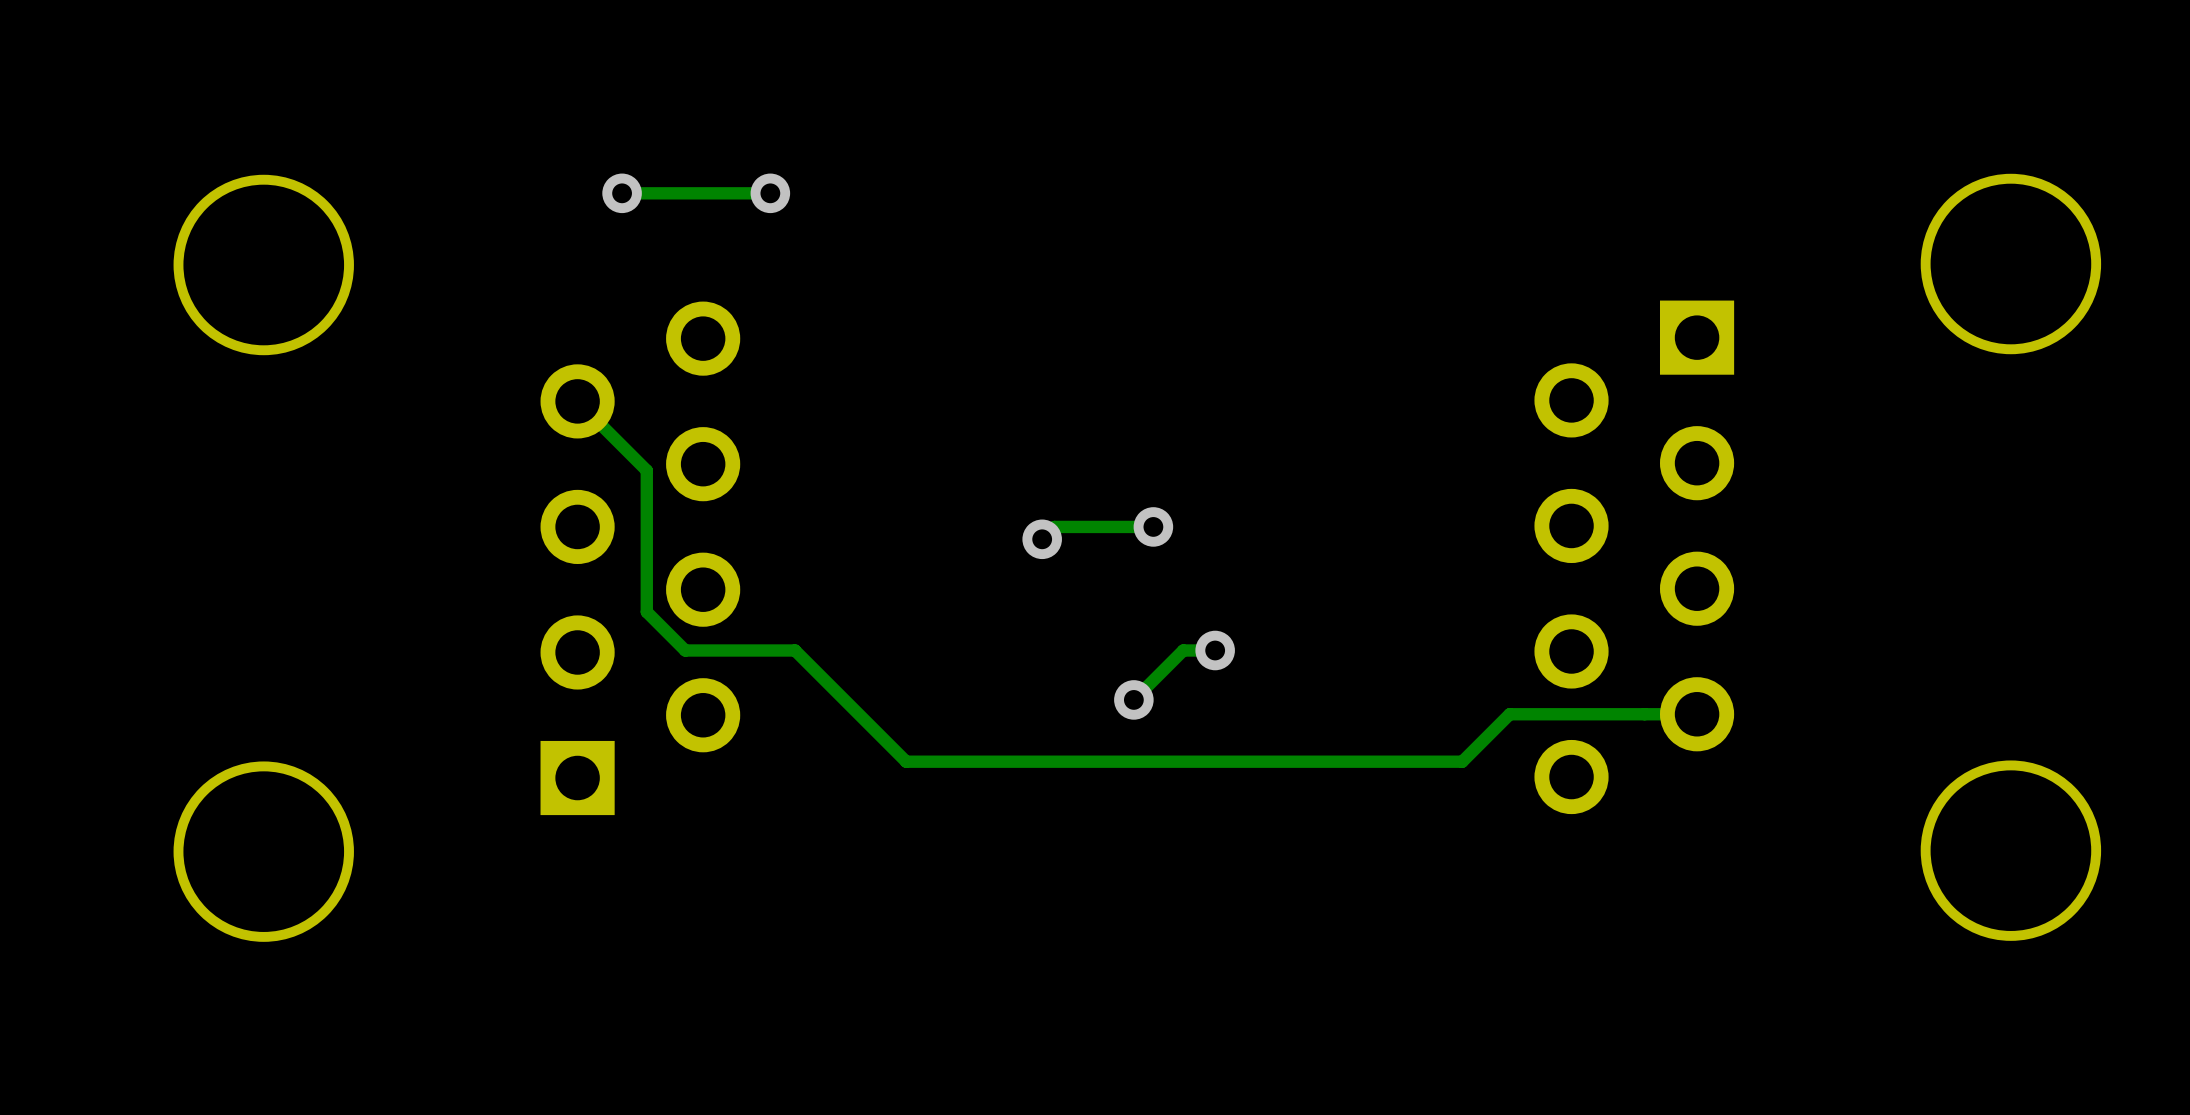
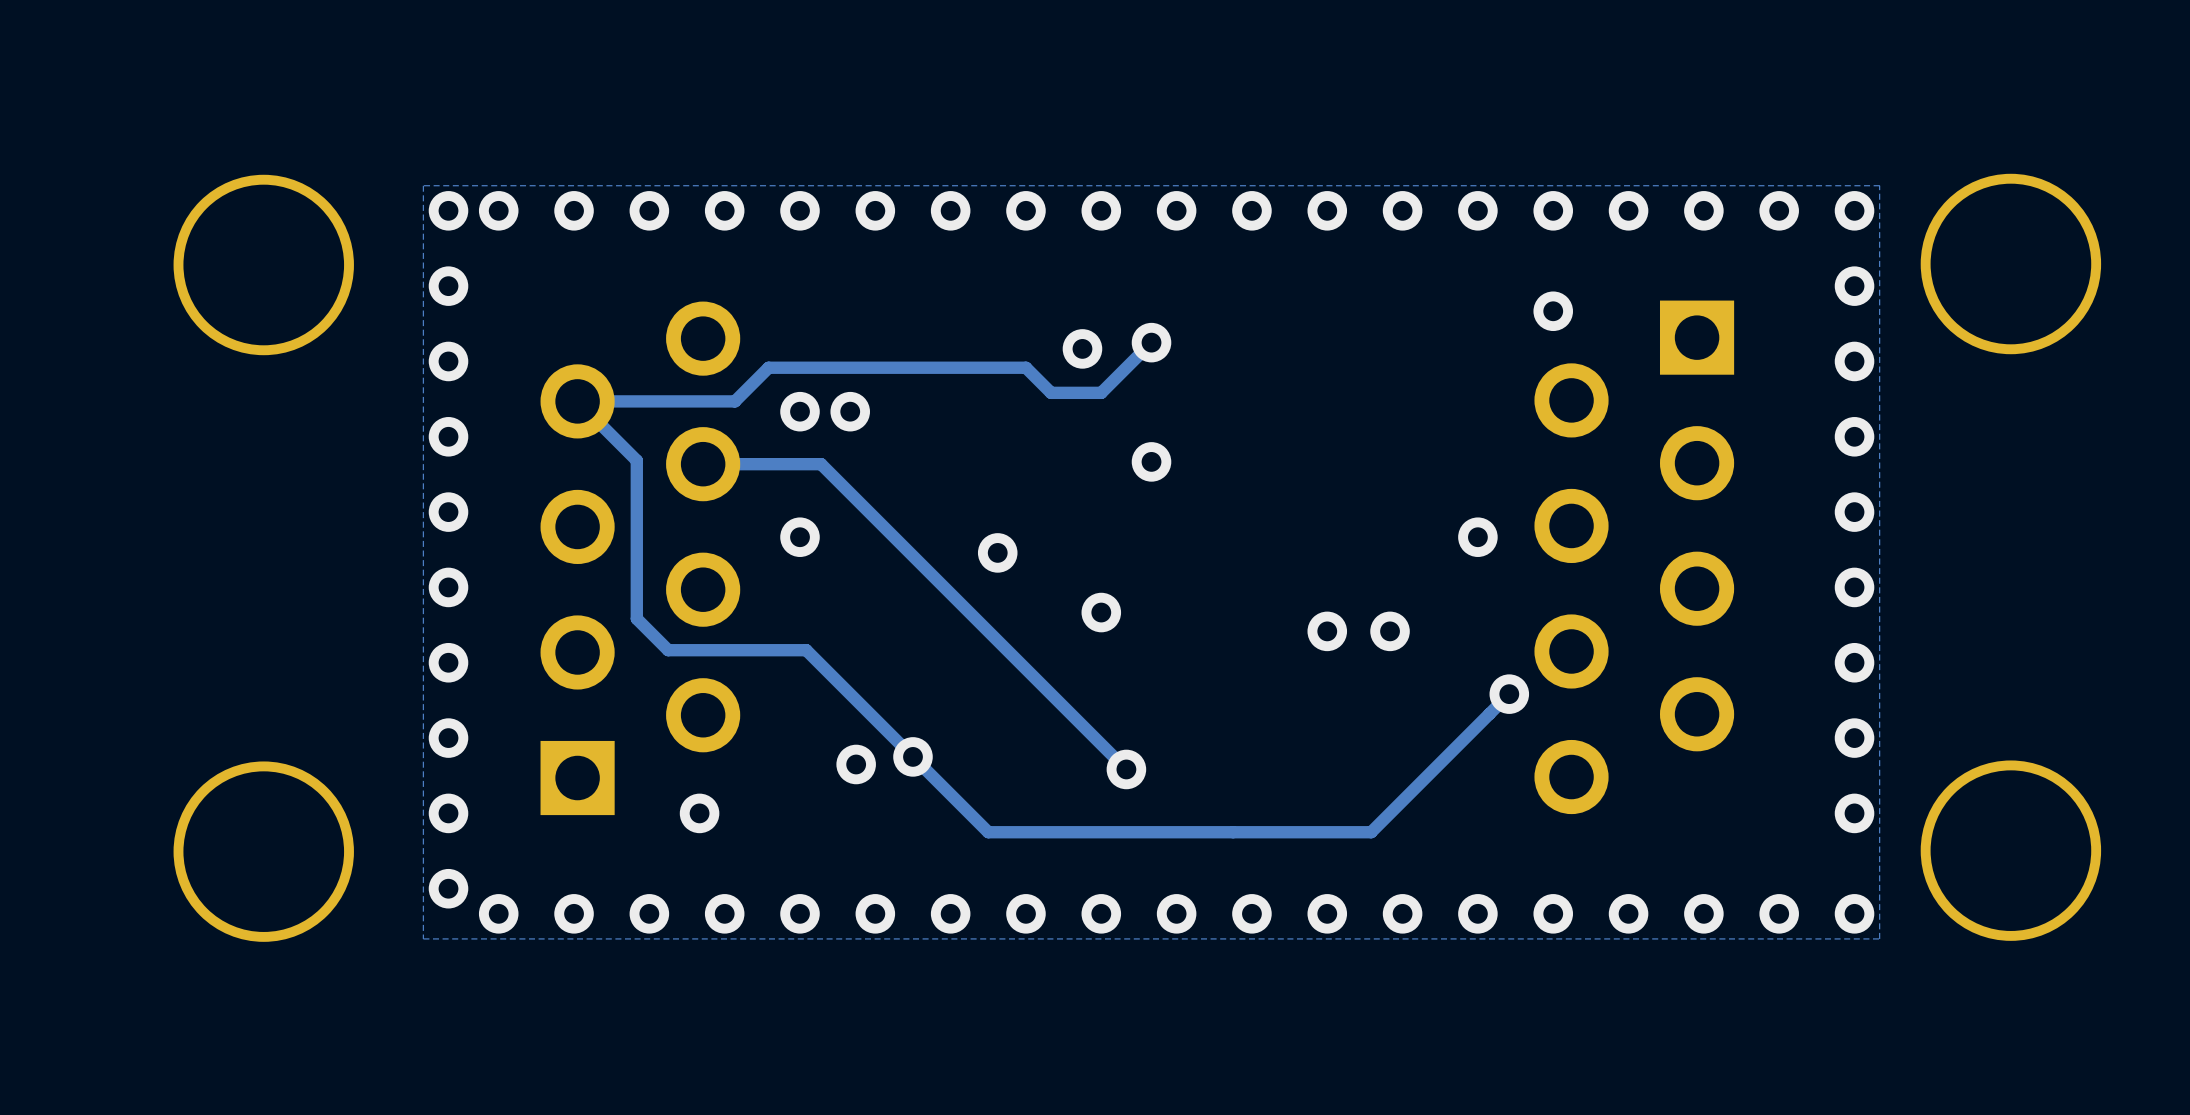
zone outline: none -> (1879, 185) (423, 185) (423, 938) (1879, 938) (1879, 185)
via position: (622, 193) -> (649, 210)
track: (770, 193) (622, 193) -> none
via position: (770, 193) -> (800, 210)
via: none -> (448, 210)
via: none -> (498, 210)
via: none -> (574, 210)
via: none -> (724, 210)
via: none -> (875, 210)
via: none -> (950, 210)
via: none -> (1025, 210)
via: none -> (1101, 210)
via: none -> (1176, 210)
via: none -> (1251, 210)
via: none -> (1327, 210)
via: none -> (1402, 210)
via: none -> (1477, 210)
via: none -> (1553, 210)
via: none -> (1628, 210)
via: none -> (1703, 210)
via: none -> (1779, 210)
via: none -> (1854, 210)
via: none -> (448, 286)
via: none -> (1854, 286)
via: none -> (1553, 311)
track: none -> (1151, 342) (1101, 392) (1051, 392) (1025, 367) (768, 367) (734, 401) (577, 401)
via: none -> (1151, 342)
via: none -> (1082, 348)
via: none -> (448, 361)
via: none -> (1854, 361)
via: none -> (800, 411)
via: none -> (850, 411)
via: none -> (448, 436)
via: none -> (1854, 436)
track: (636, 460) (646, 470) (646, 612) (685, 650) (795, 650) (906, 761) (1462, 761) (1509, 714) (1697, 714) -> (636, 460) (636, 618) (668, 650) (806, 650) (988, 832) (1371, 832) (1509, 694)
via: none -> (1151, 461)
track: none -> (703, 464) (821, 464) (1126, 769)
via: none -> (448, 512)
via: none -> (1854, 512)
track: (1153, 526) (1054, 526) (1042, 539) -> none
via: (1153, 526) -> none
via: none -> (800, 537)
via: none -> (1477, 537)
via position: (1042, 539) -> (997, 552)
via: none -> (448, 587)
via: none -> (1854, 587)
via: none -> (1101, 612)
via: none -> (1327, 631)
via: none -> (1390, 631)
track: (1215, 650) (1183, 650) (1133, 699) -> none
via: (1215, 650) -> none
via: none -> (448, 662)
via: none -> (1854, 662)
via: none -> (1509, 694)
via: (1133, 699) -> none
via: none -> (448, 738)
via: none -> (1854, 738)
via: none -> (912, 756)
via: none -> (856, 764)
via: none -> (1126, 769)
via: none -> (448, 813)
via: none -> (699, 813)
via: none -> (1854, 813)
via: none -> (448, 888)
via: none -> (498, 913)
via: none -> (574, 913)
via: none -> (649, 913)
via: none -> (724, 913)
via: none -> (800, 913)
via: none -> (875, 913)
via: none -> (950, 913)
via: none -> (1025, 913)
via: none -> (1101, 913)
via: none -> (1176, 913)
via: none -> (1251, 913)
via: none -> (1327, 913)
via: none -> (1402, 913)
via: none -> (1477, 913)
via: none -> (1553, 913)
via: none -> (1628, 913)
via: none -> (1703, 913)
via: none -> (1779, 913)
via: none -> (1854, 913)

